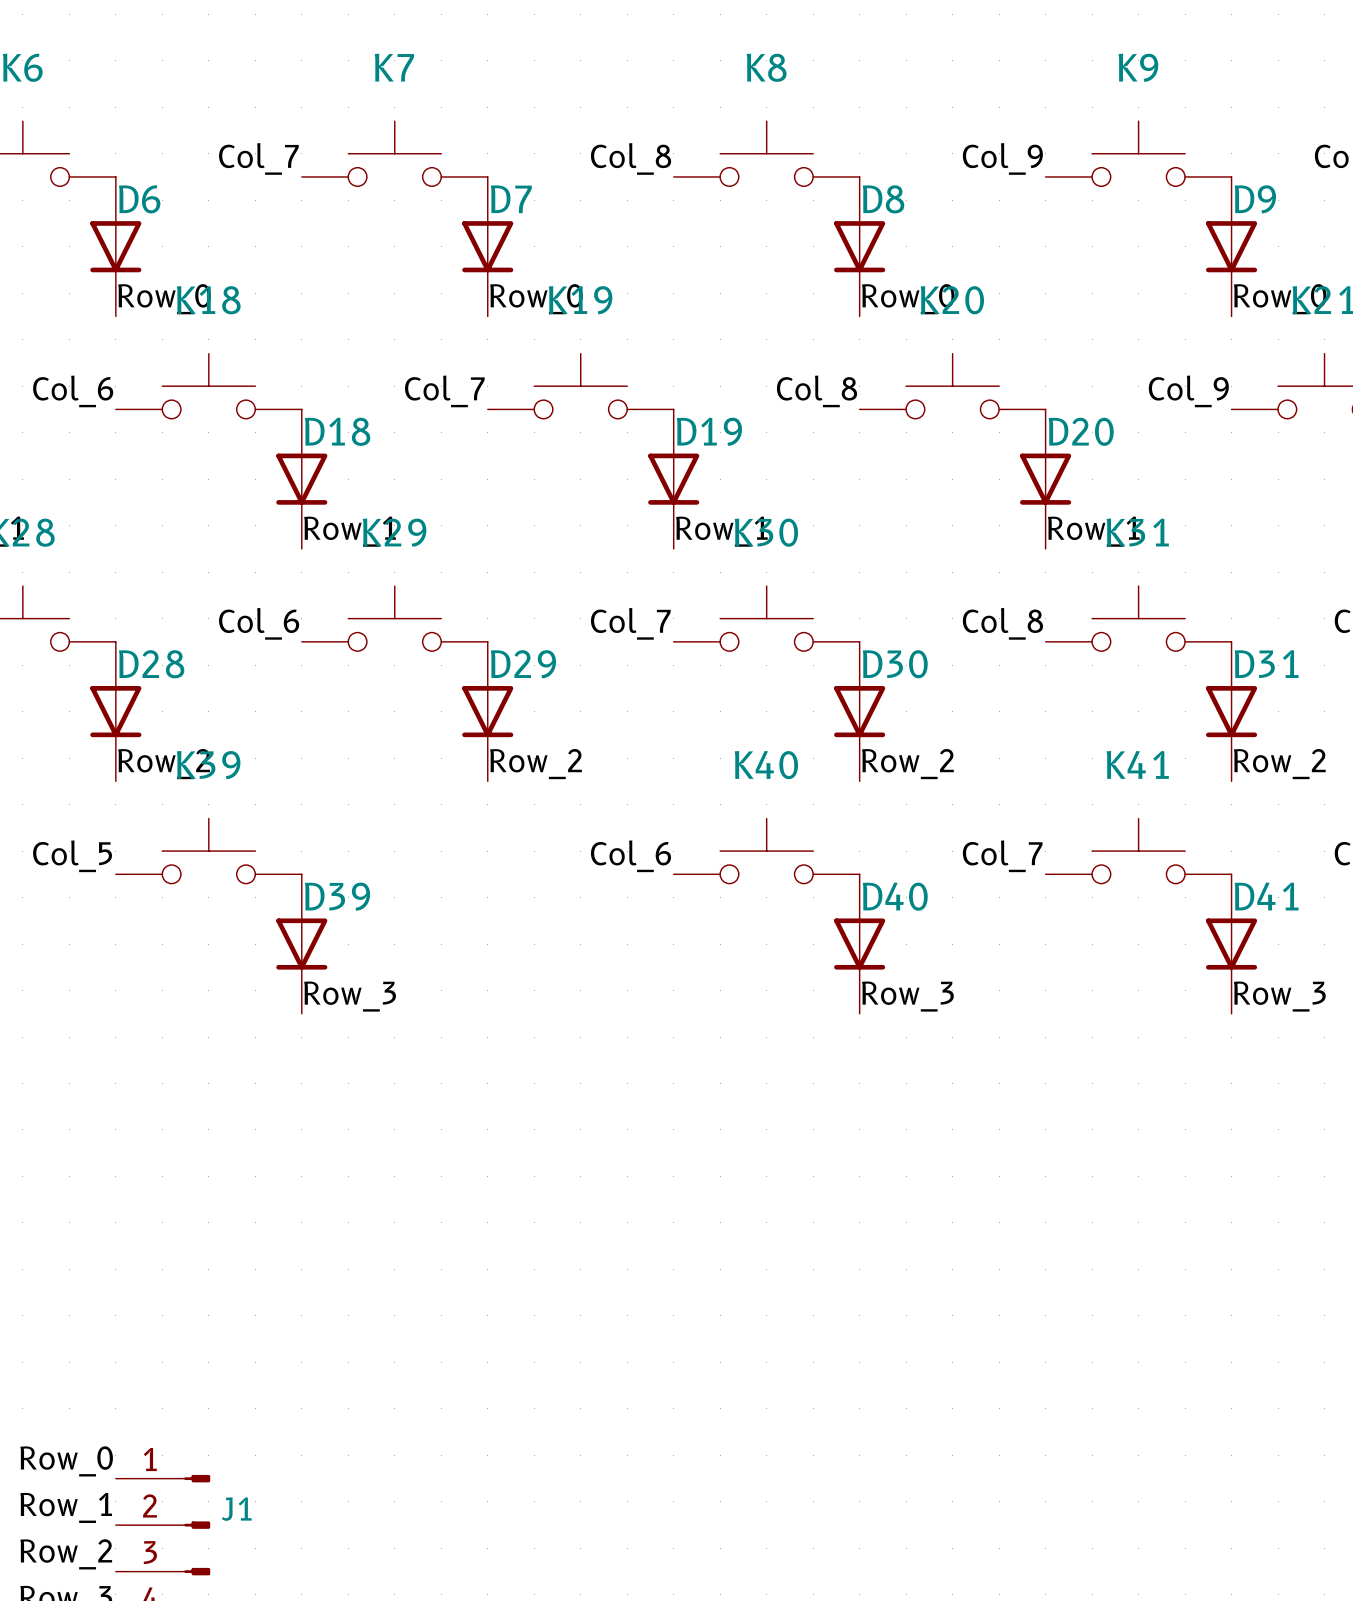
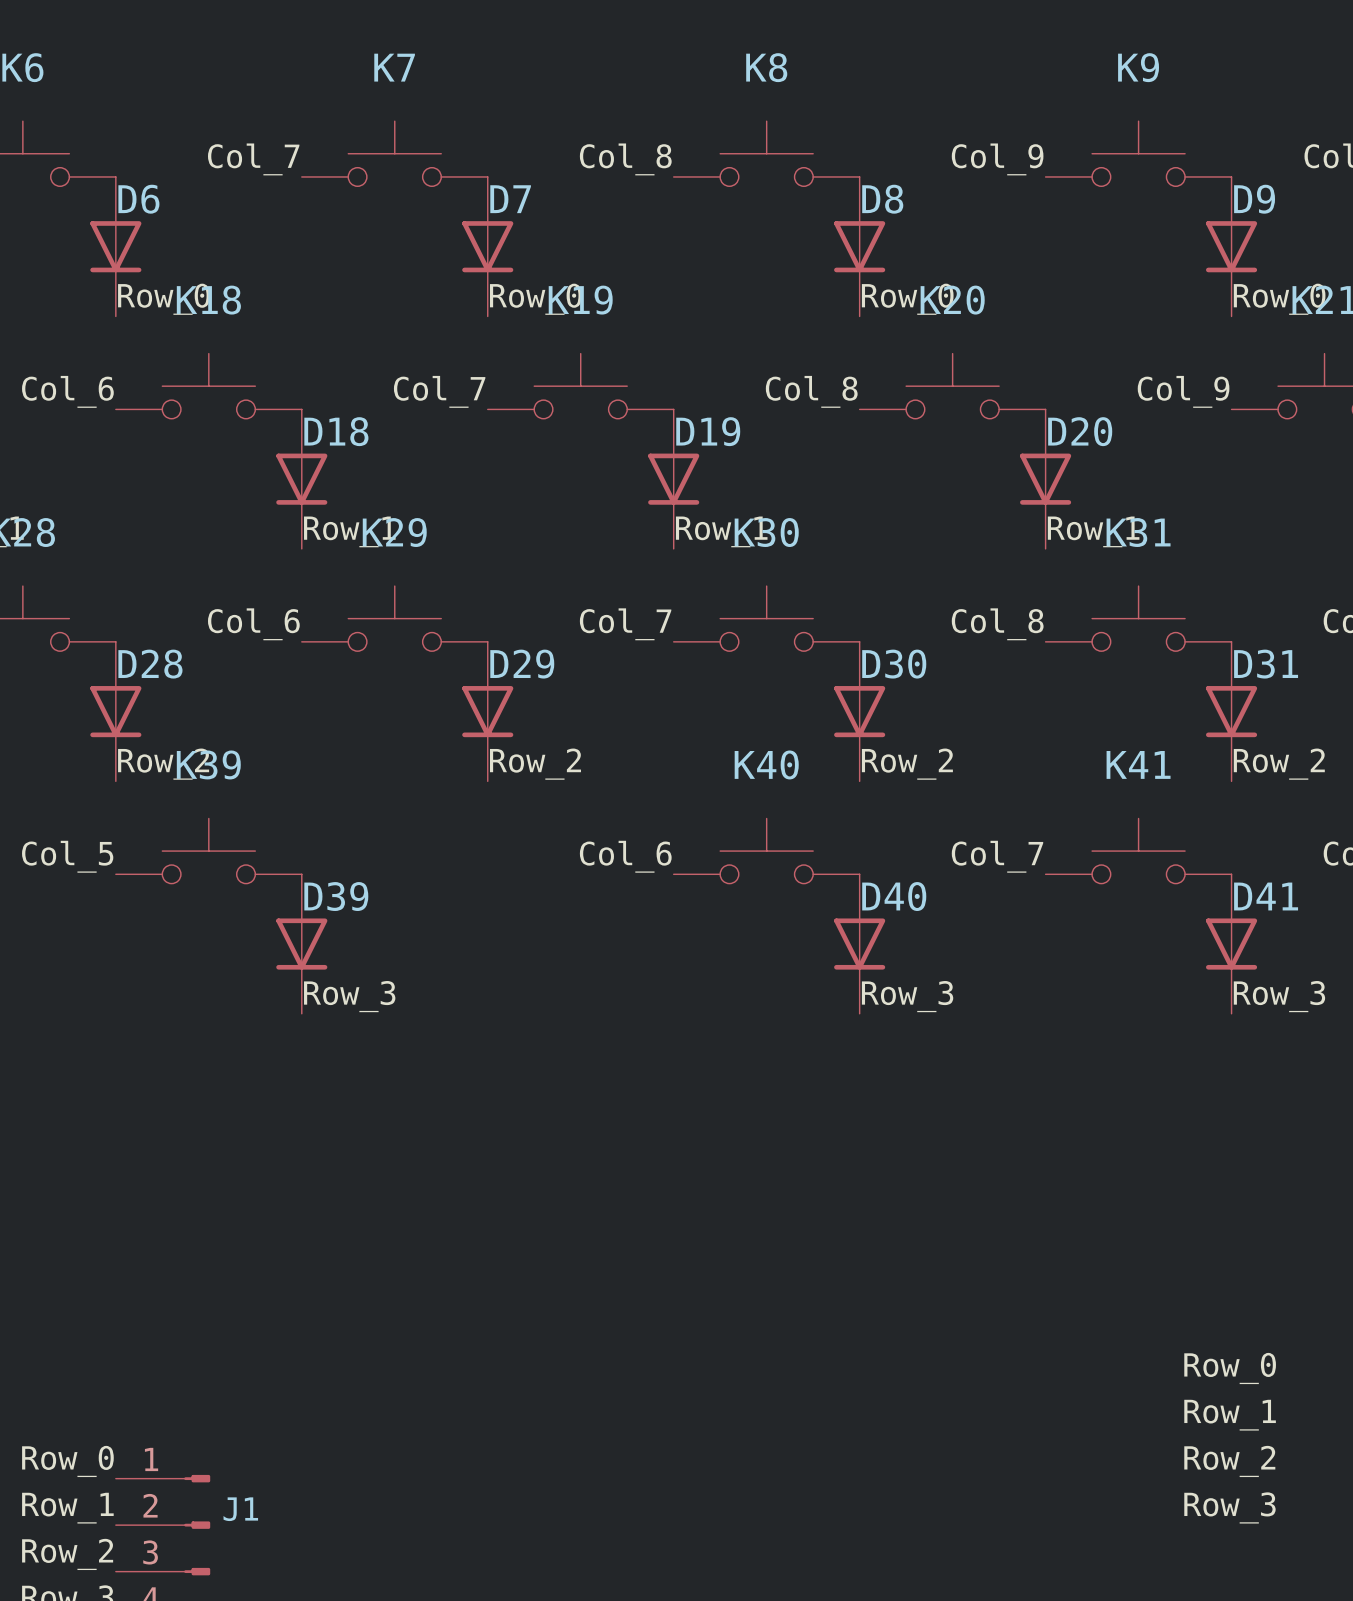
label: none -> Row_0 (1230, 1368)
label: none -> Row_1 (1230, 1415)
label: none -> Row_2 (1229, 1461)
label: none -> Row_3 (1229, 1507)

